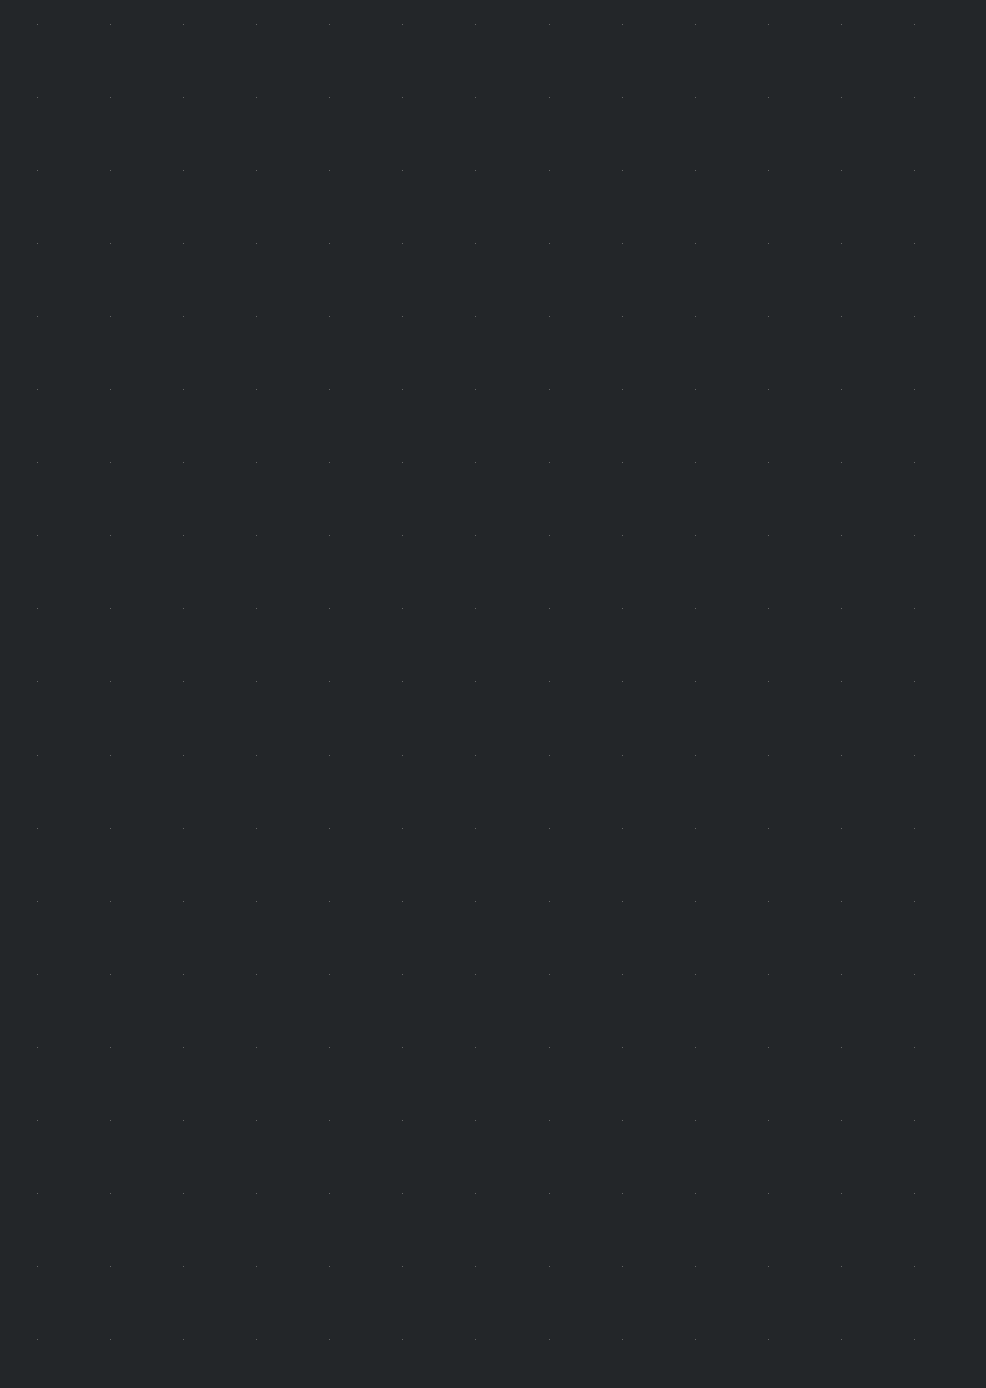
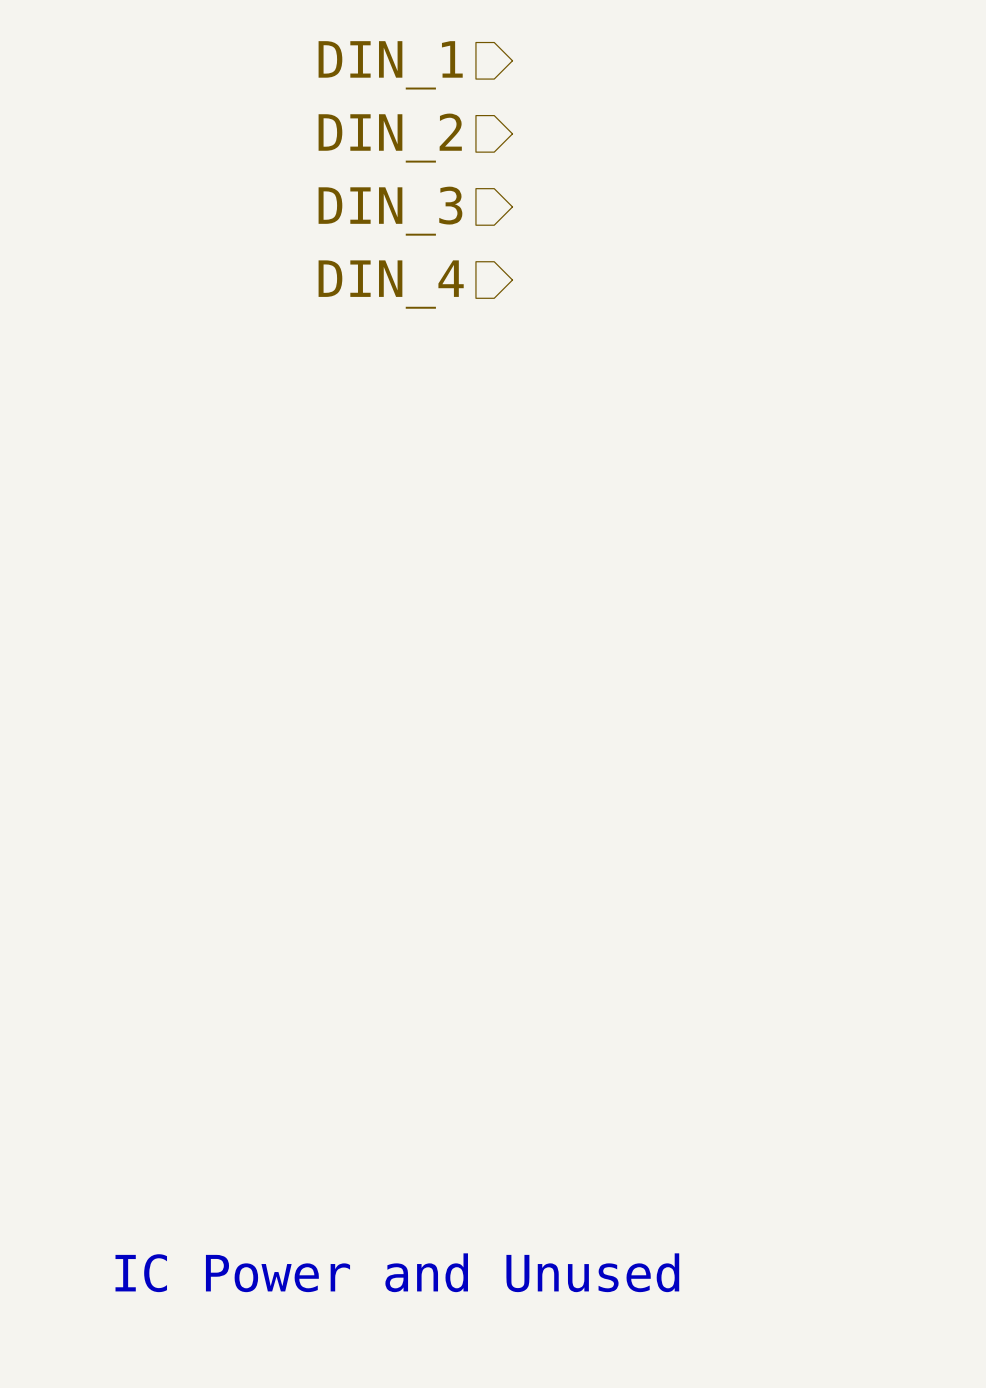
hierarchical label: none -> DIN_1 (390, 65)
hierarchical label: none -> DIN_2 (390, 138)
hierarchical label: none -> DIN_3 (390, 211)
hierarchical label: none -> DIN_4 (391, 284)
text: none -> IC Power and Unused (397, 1272)

